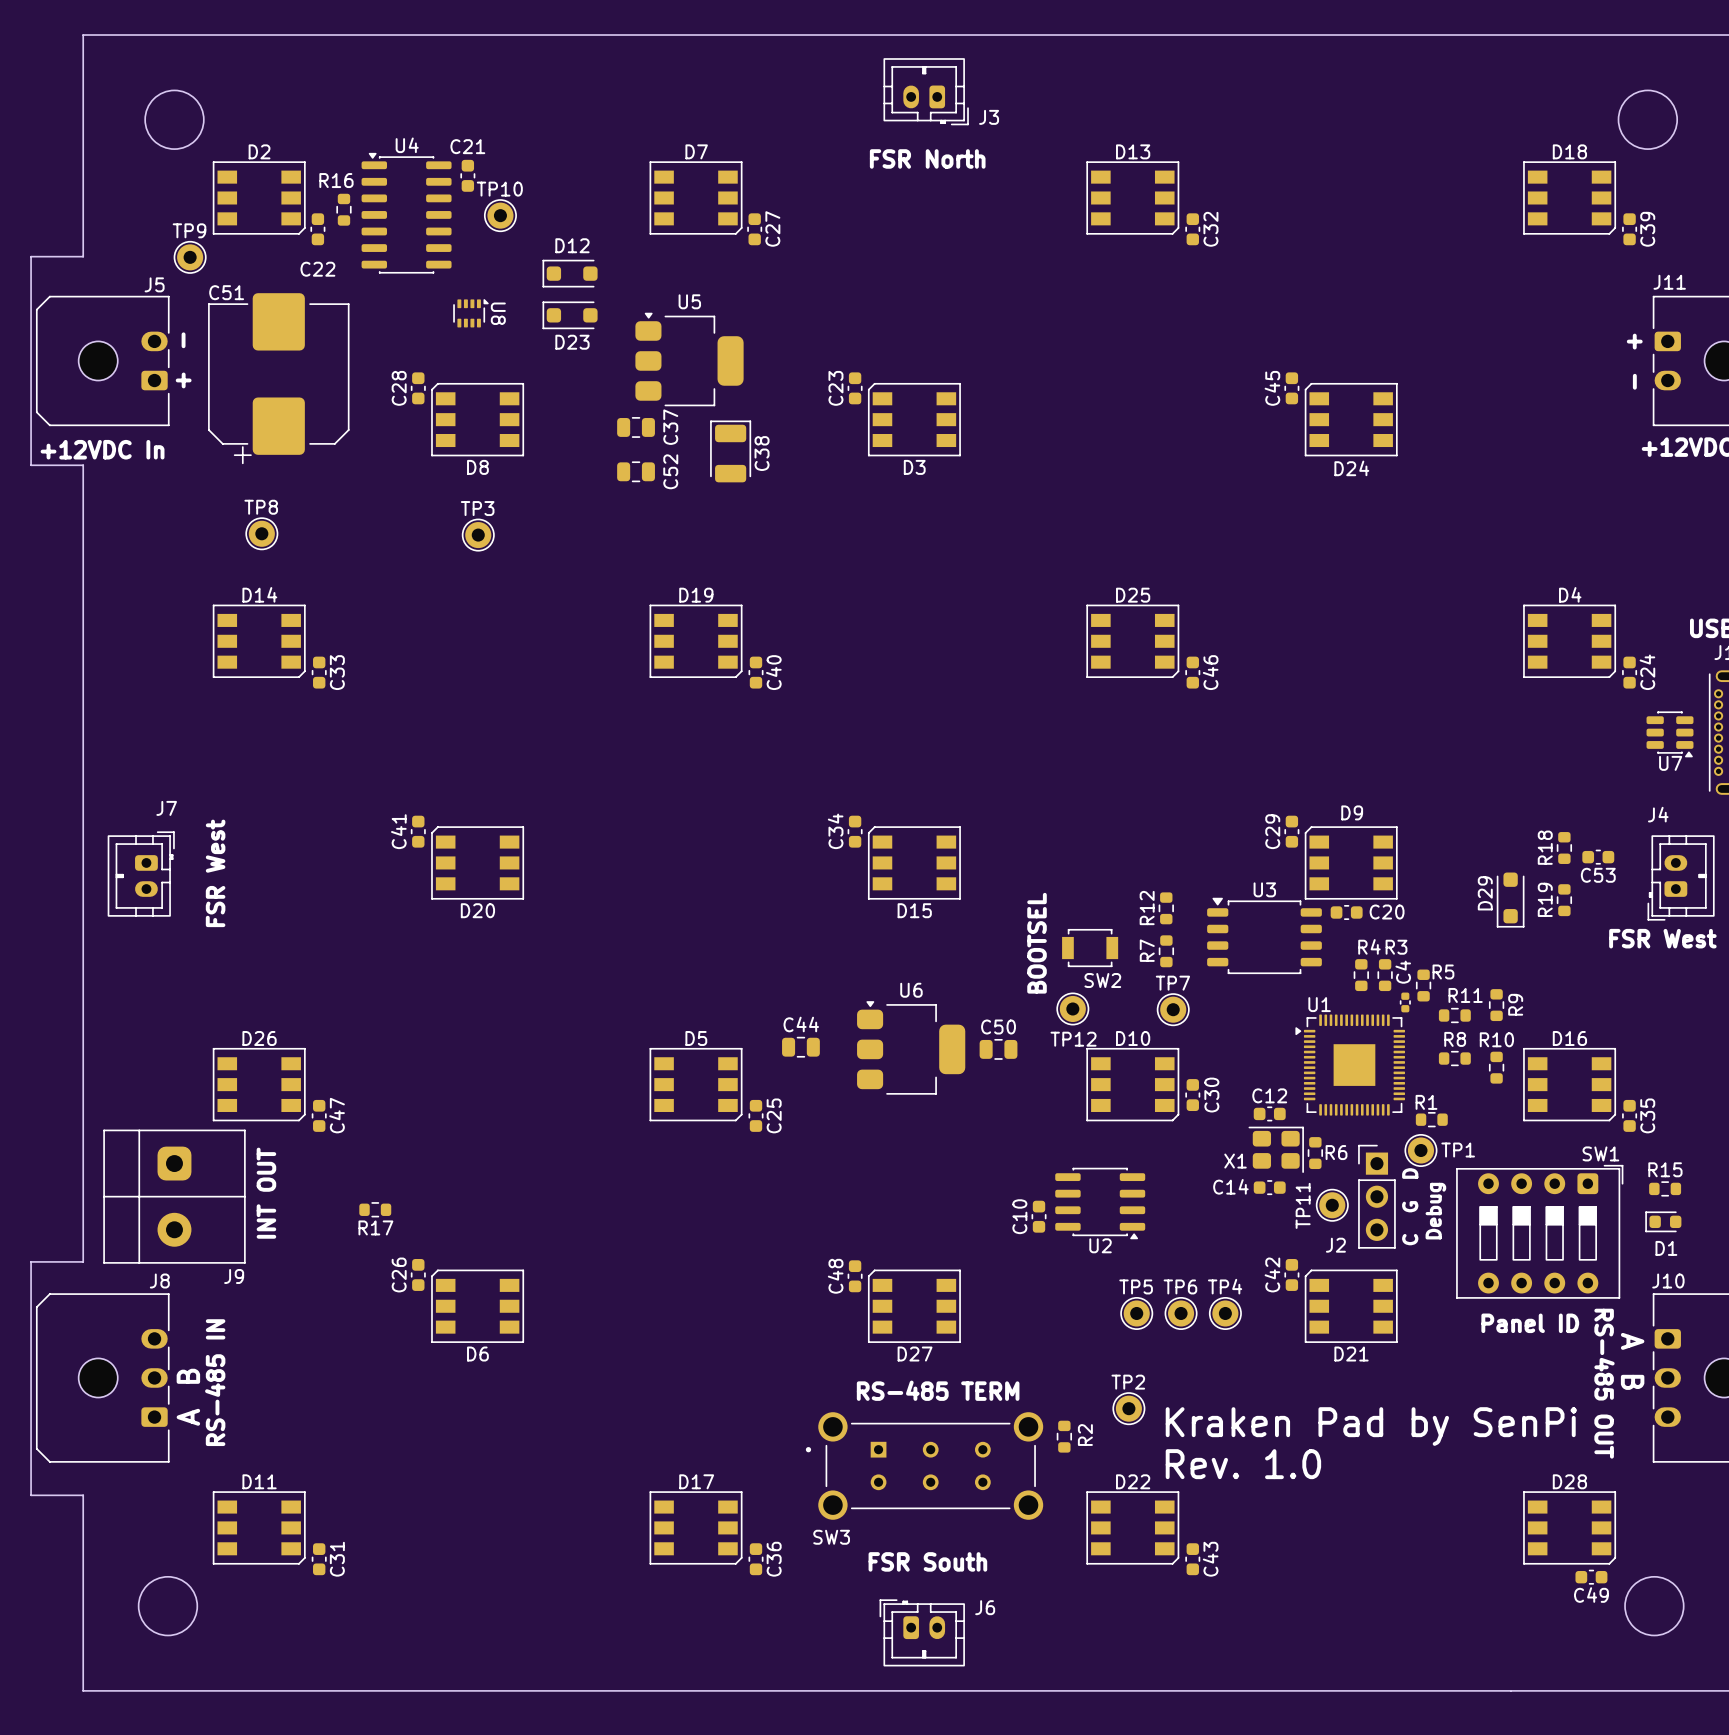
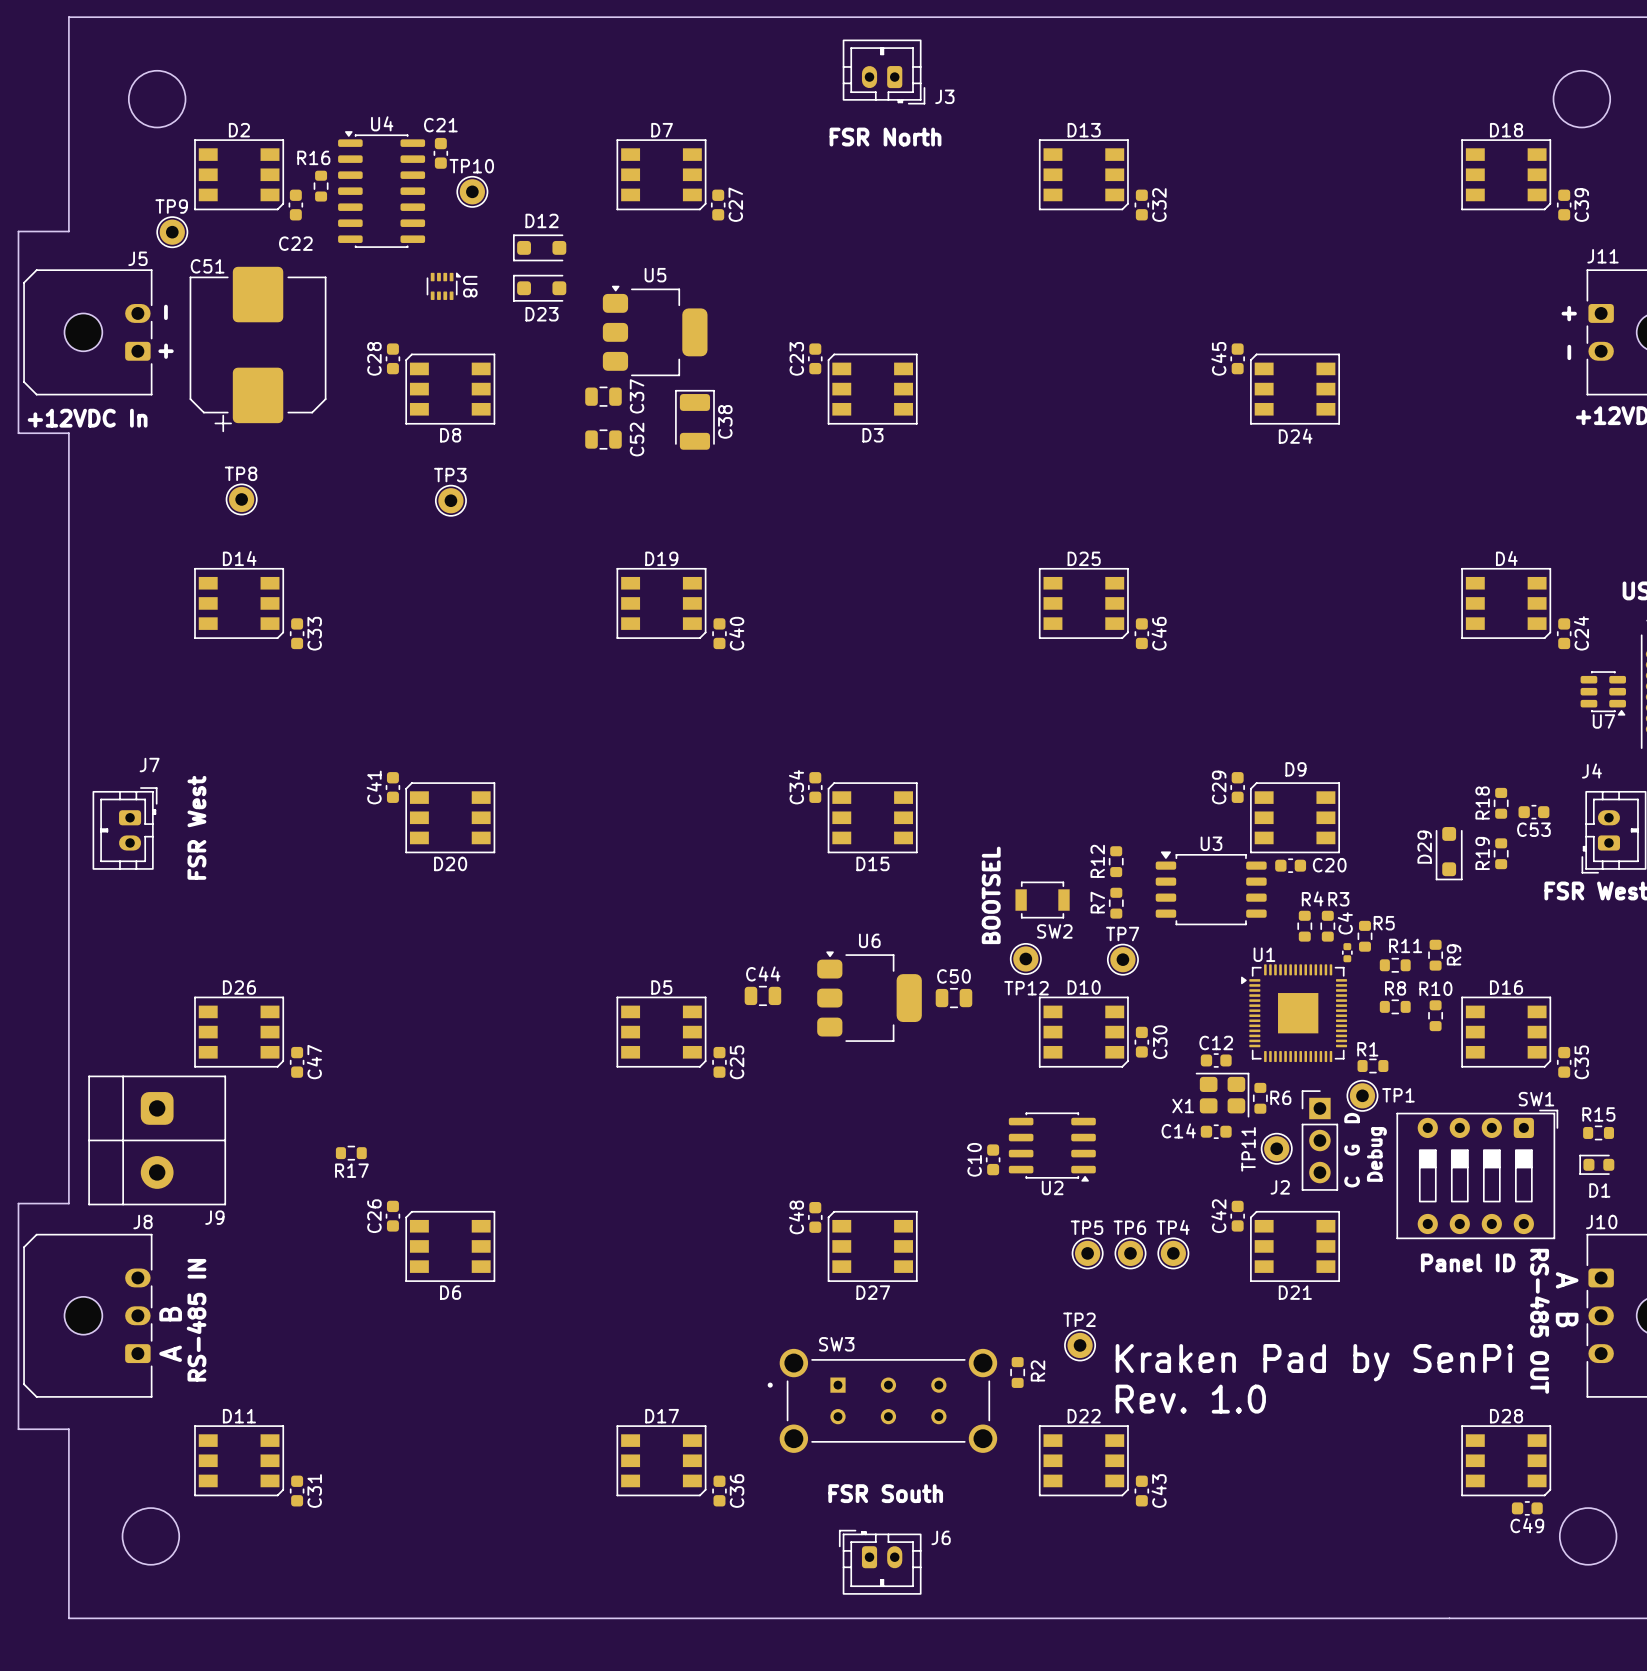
text: INT OUT (266, 1193) -> none
text: RS-485 TERM (938, 1390) -> none
SW3 name position: SW3 (831, 1537) -> SW3 (836, 1344)

